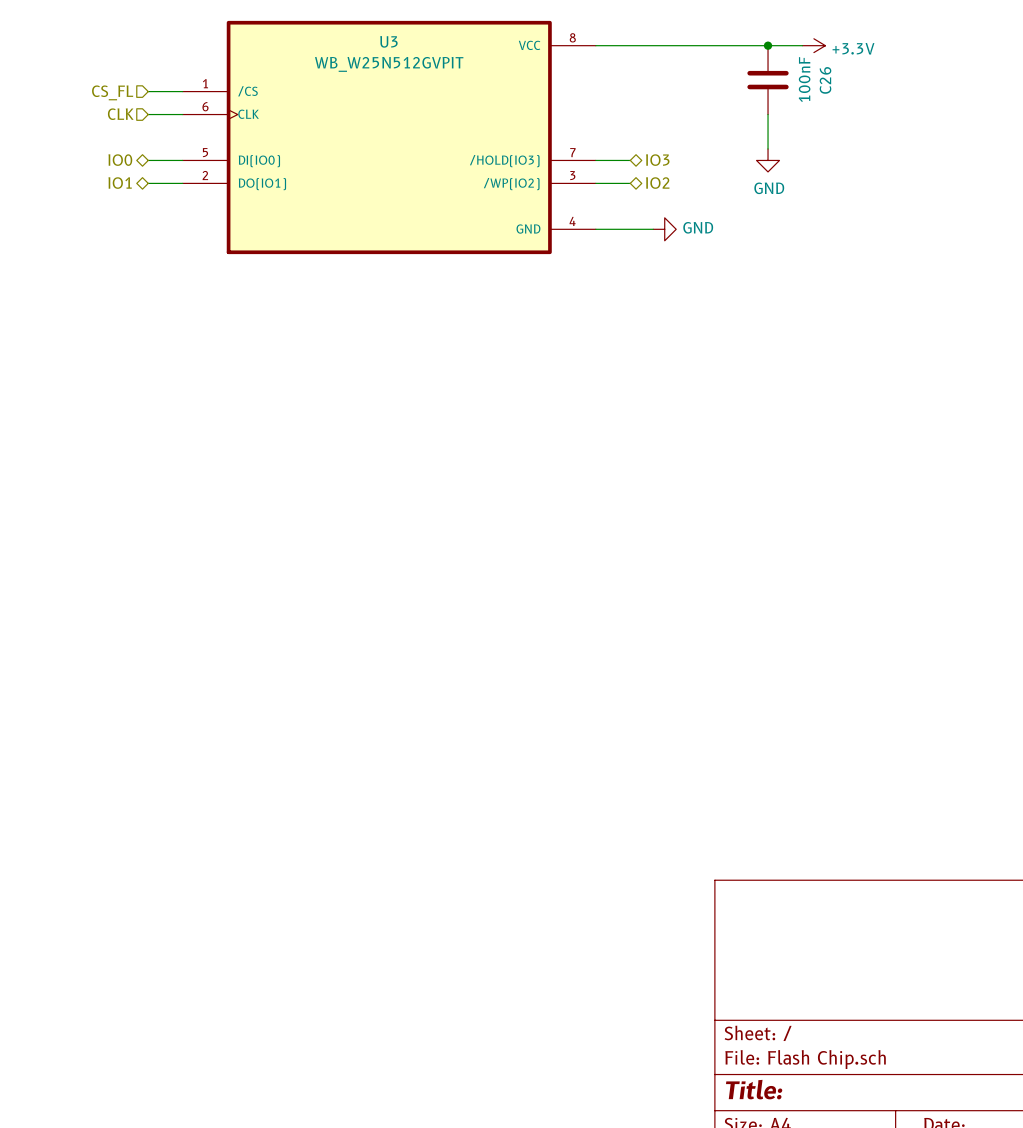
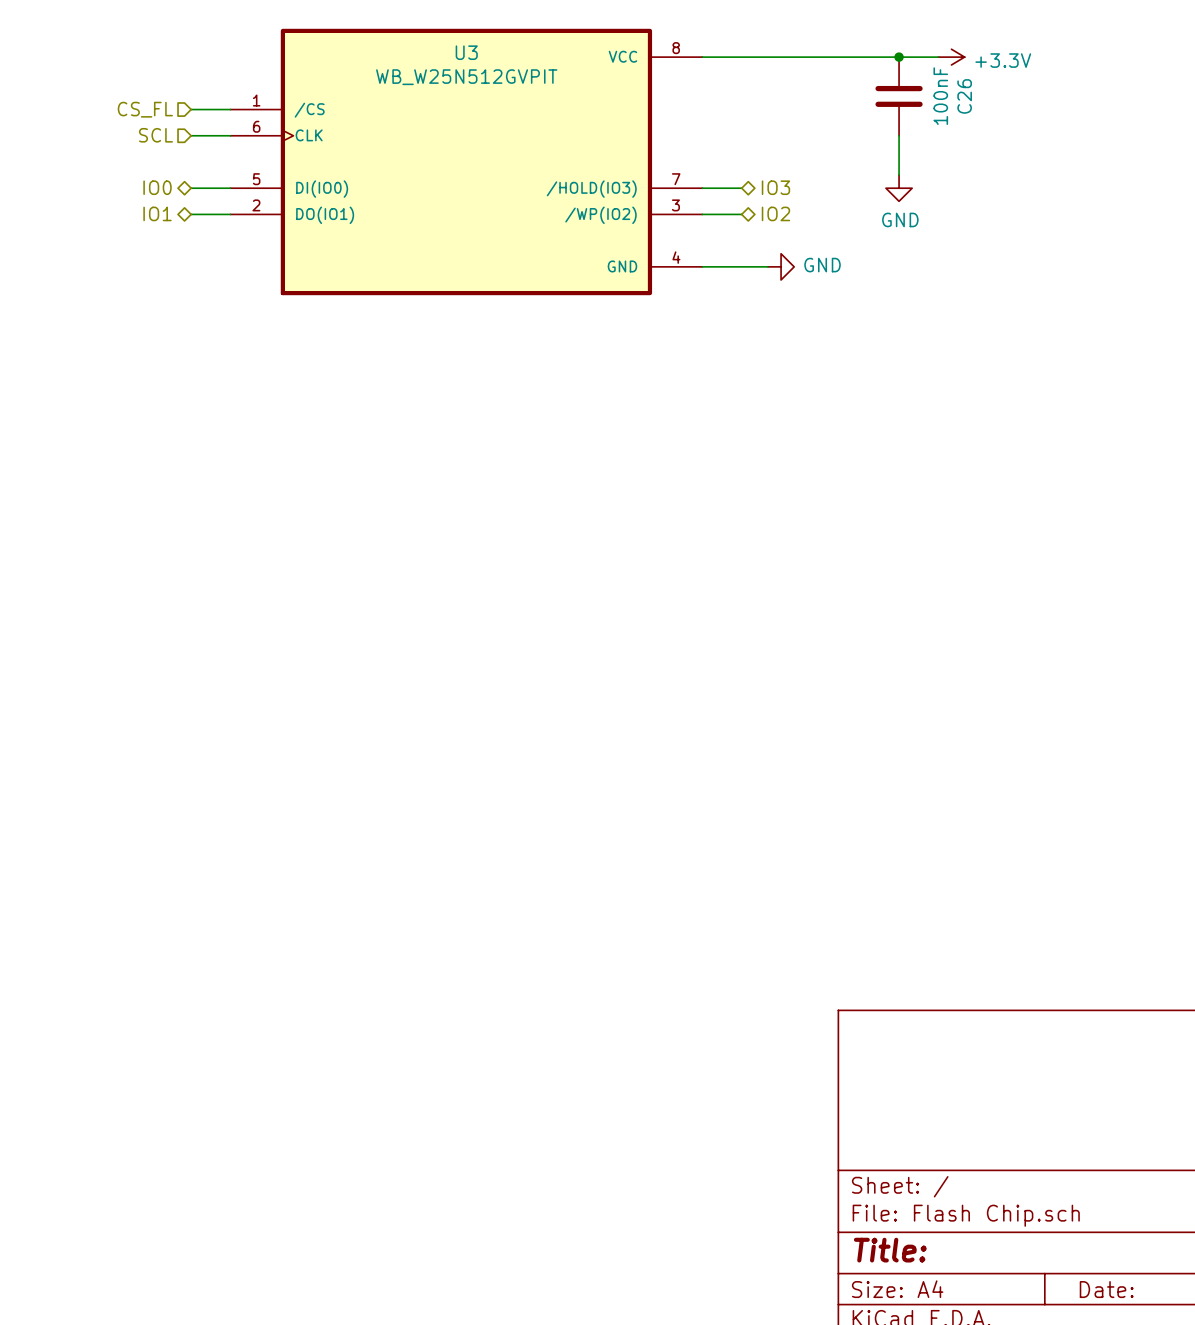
hierarchical label: CLK (120, 114) -> SCL (155, 135)

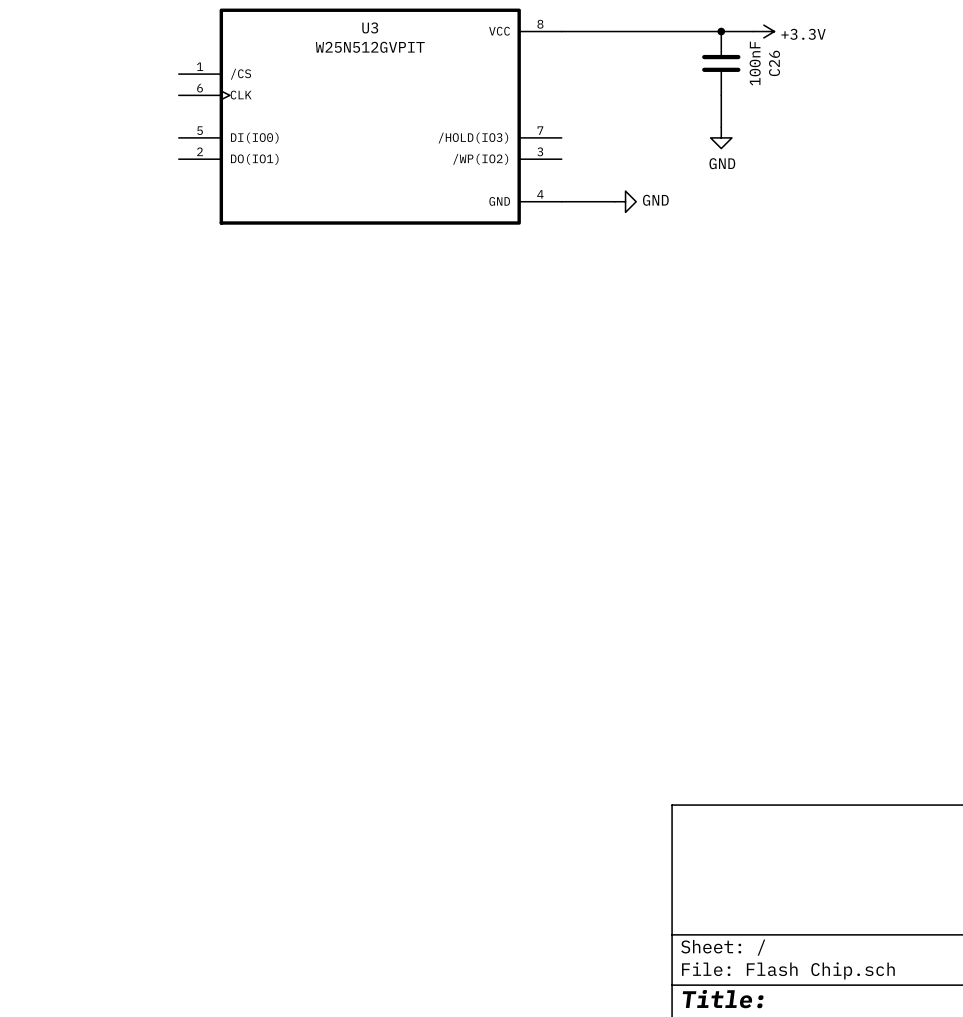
U3 value: WB_W25N512GVPIT (466, 77) -> W25N512GVPIT (370, 47)
hierarchical label: CS_FL (145, 109) -> none
wire: (191, 109) (230, 109) -> none
hierarchical label: SCL (155, 135) -> none
wire: (191, 135) (230, 135) -> none
hierarchical label: IO0 (157, 187) -> none
hierarchical label: IO3 (775, 187) -> none
wire: (191, 188) (230, 188) -> none
wire: (702, 188) (741, 188) -> none
hierarchical label: IO1 (157, 213) -> none
hierarchical label: IO2 (775, 213) -> none
wire: (191, 214) (230, 214) -> none
wire: (702, 214) (741, 214) -> none

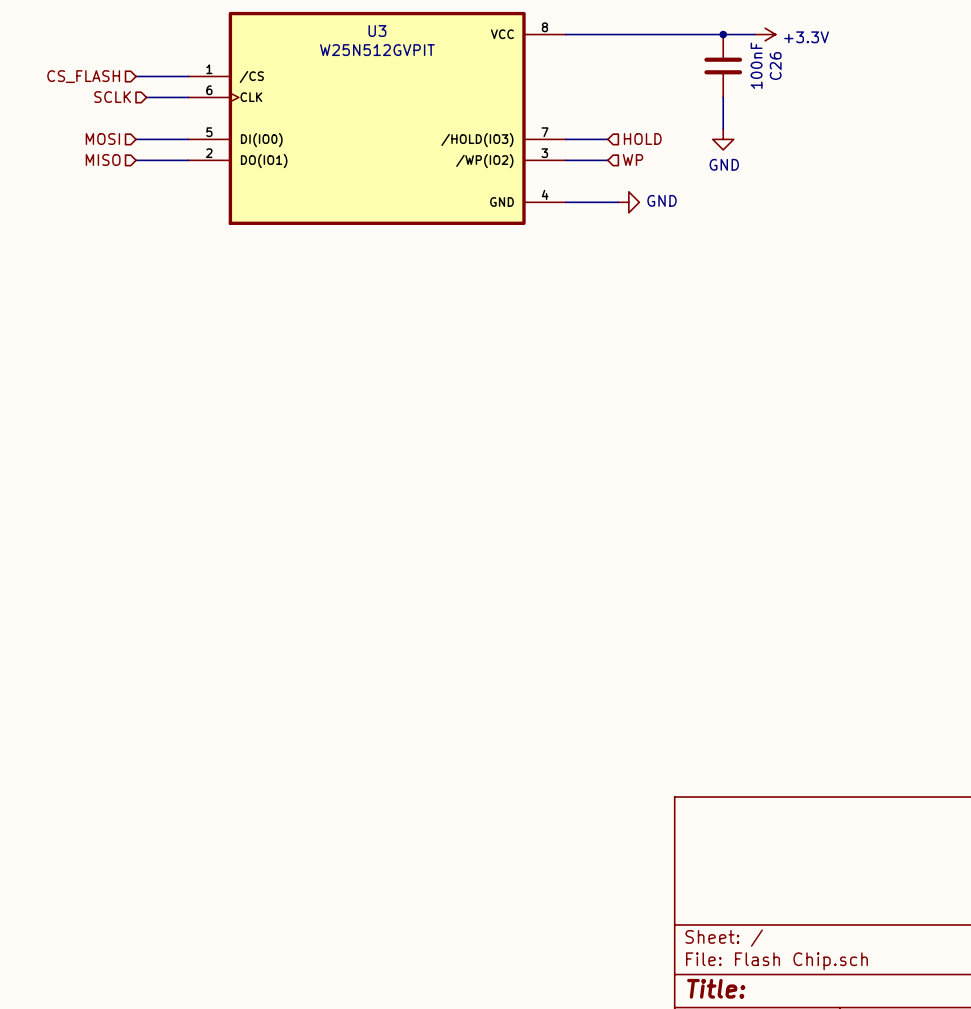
hierarchical label: none -> CS_FLASH (83, 76)
wire: none -> (136, 76) (188, 76)
hierarchical label: none -> SCLK (112, 97)
wire: none -> (146, 97) (188, 97)
hierarchical label: none -> MOSI (102, 139)
wire: none -> (136, 139) (188, 139)
wire: none -> (565, 139) (607, 139)
hierarchical label: none -> HOLD (642, 139)
hierarchical label: none -> MISO (103, 159)
hierarchical label: none -> WP (633, 159)
wire: none -> (136, 160) (188, 160)
wire: none -> (565, 160) (607, 160)

